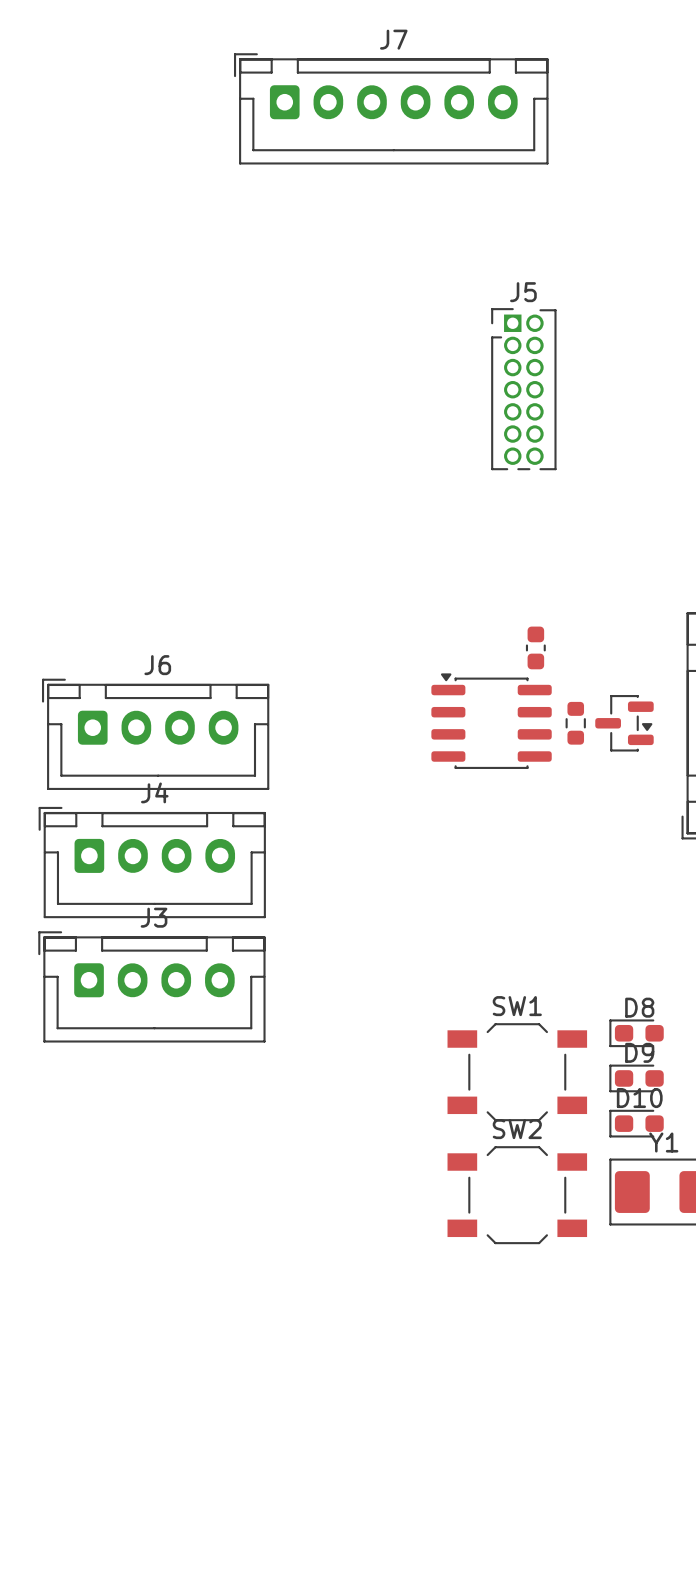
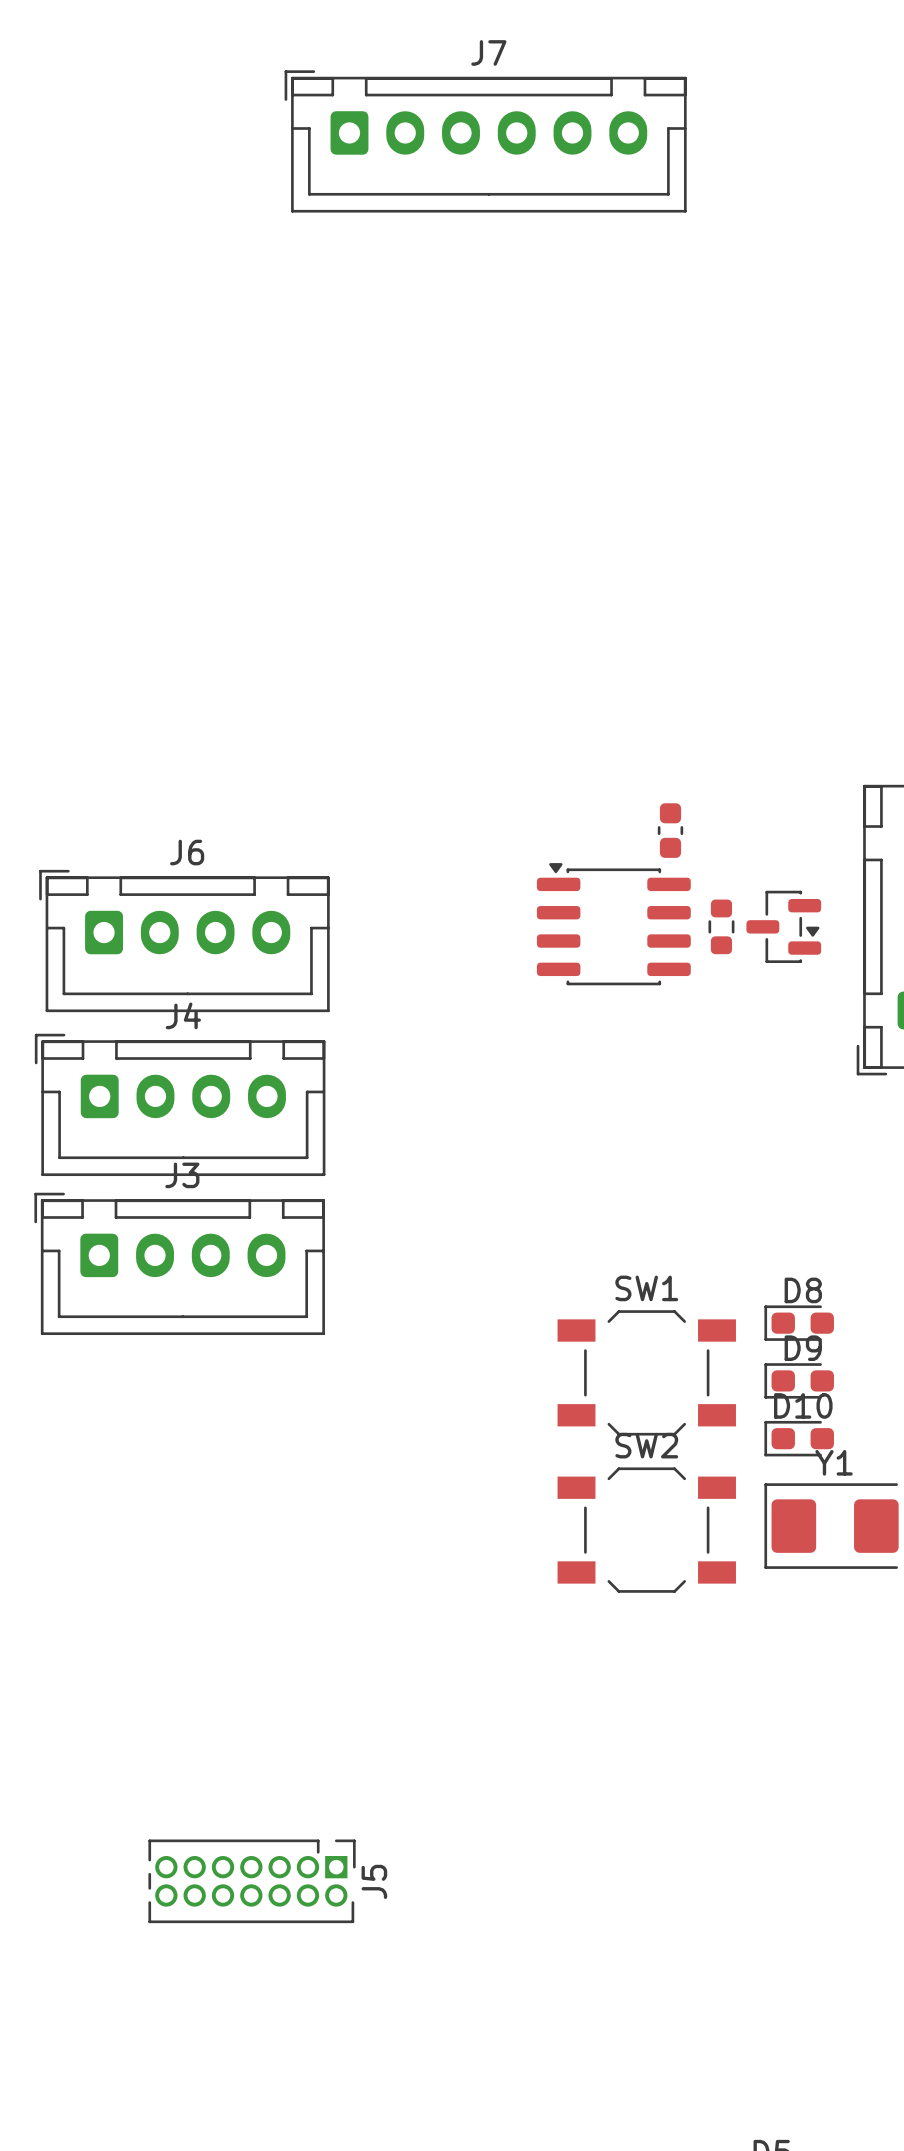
J5 rotation: 0° (523, 389) -> 90° clockwise (252, 1881)
J5 position: (523, 389) -> (252, 1881)

